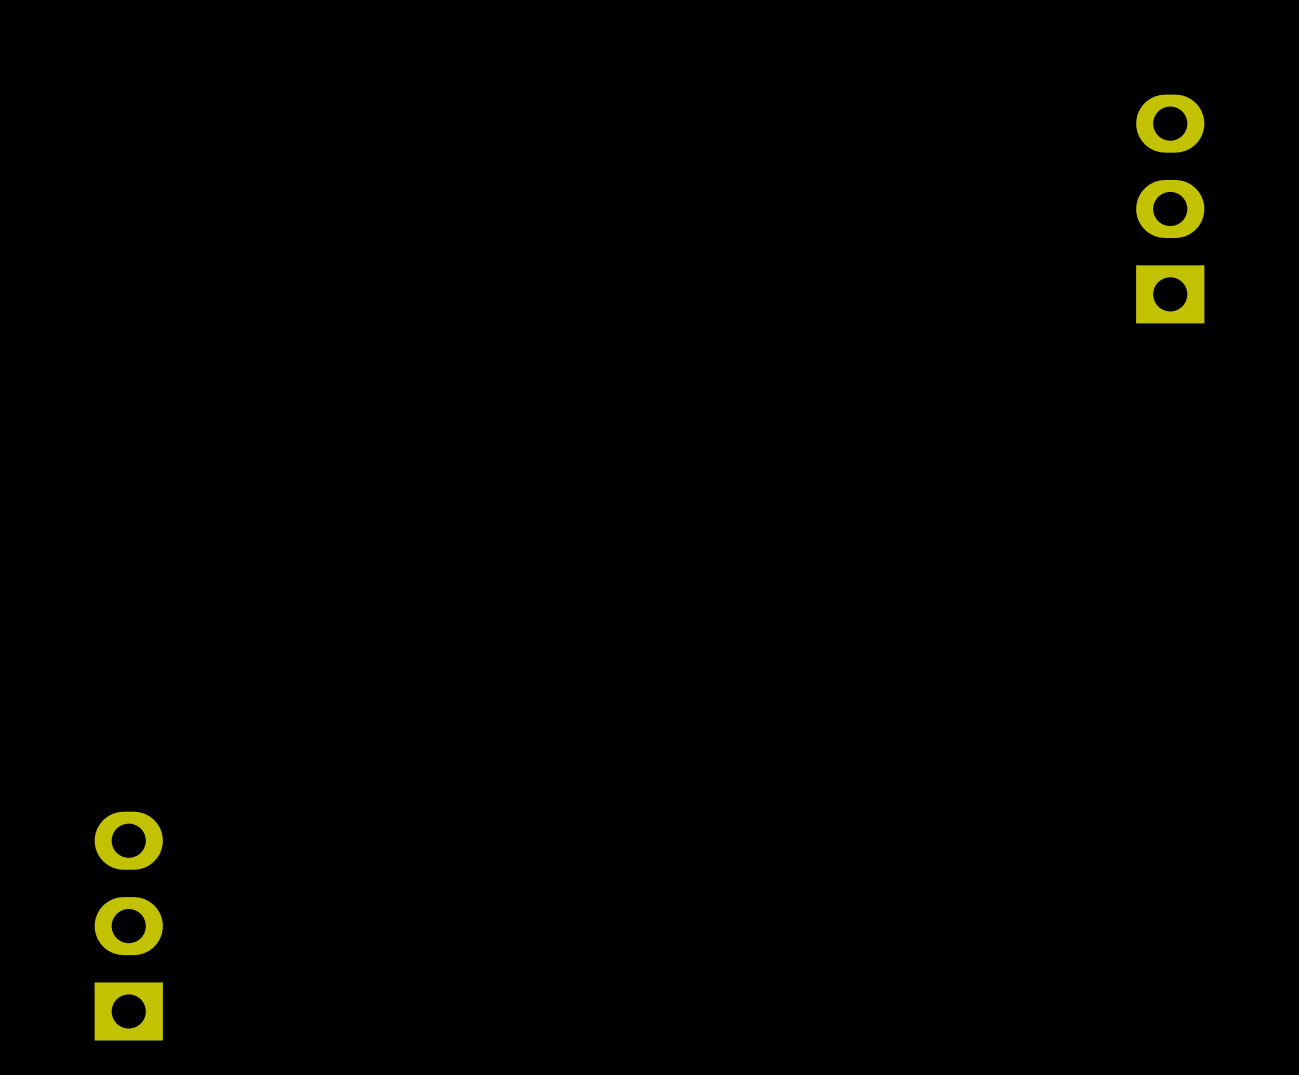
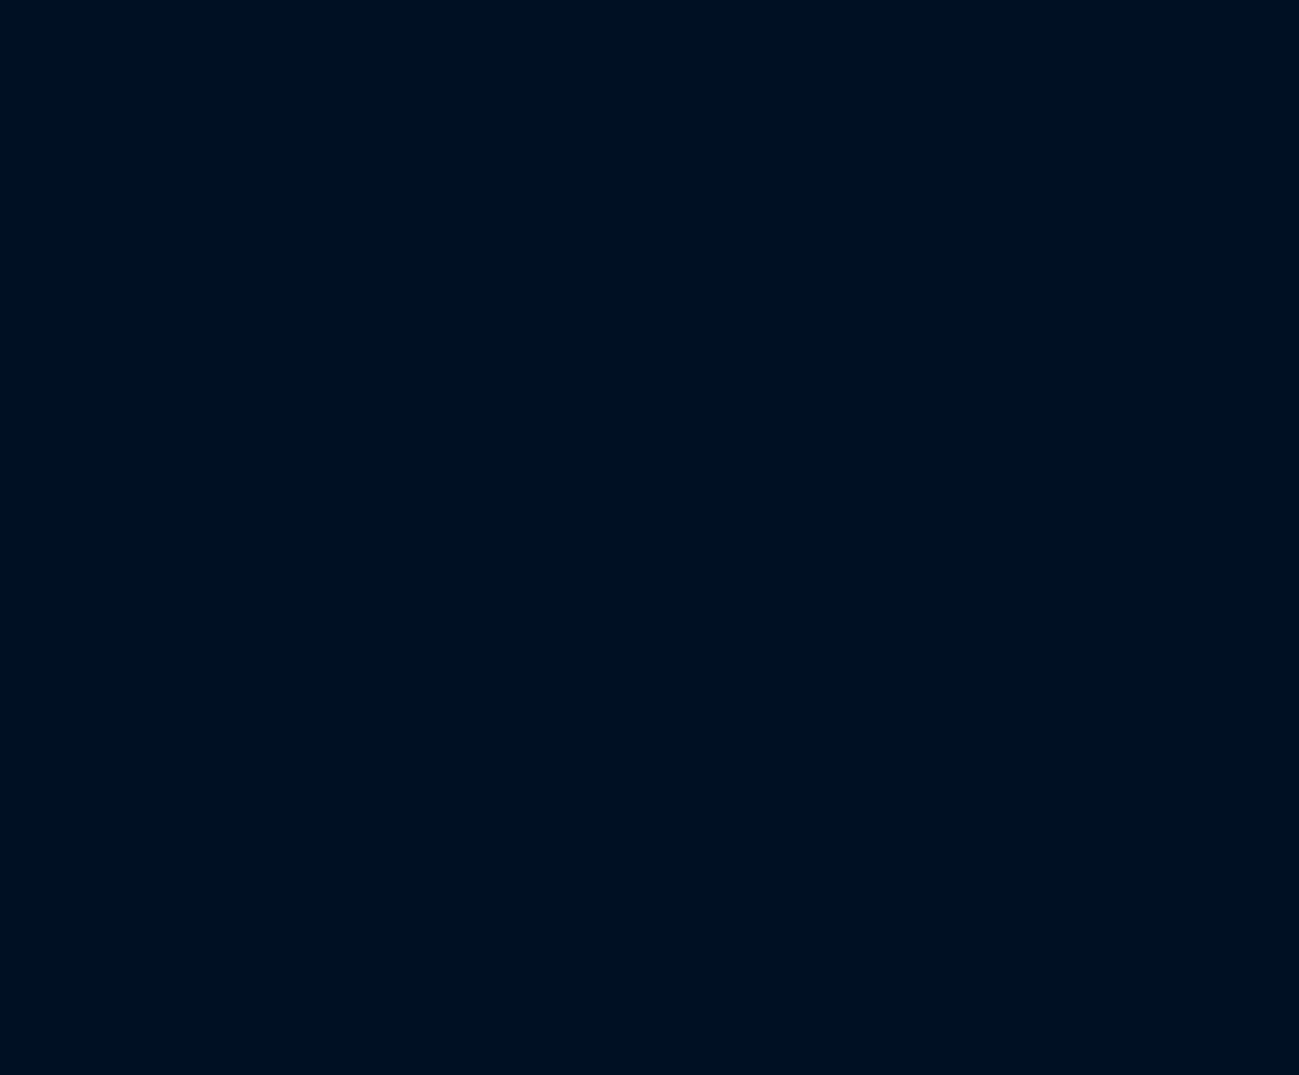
part: (1170, 208) -> none
part: (128, 926) -> none

